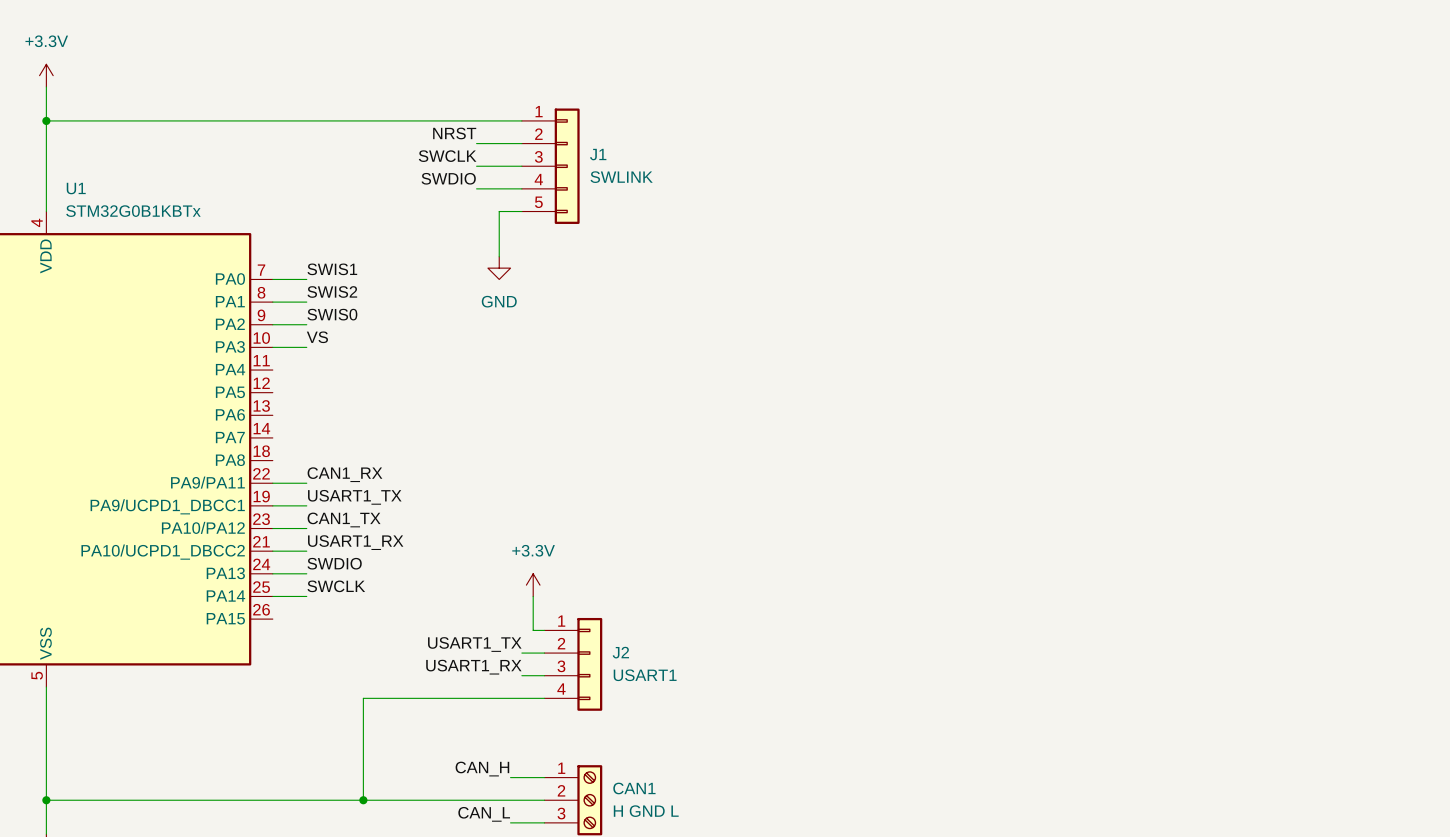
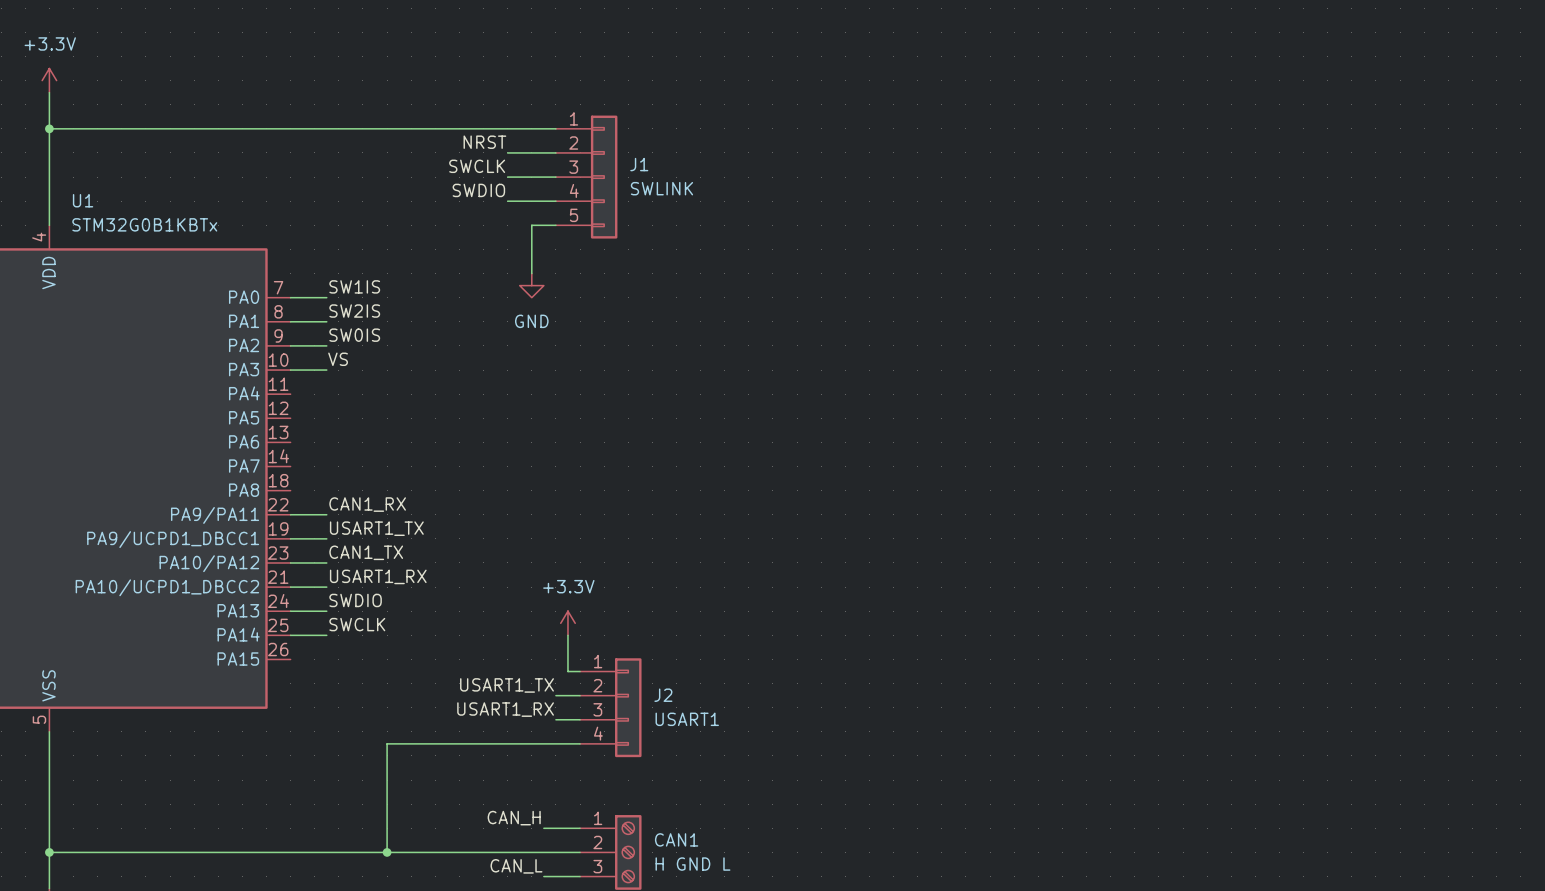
label: SWIS1 (332, 269) -> SW1IS (354, 286)
label: SWIS2 (332, 291) -> SW2IS (354, 311)
label: SWIS0 (332, 314) -> SW0IS (354, 335)

